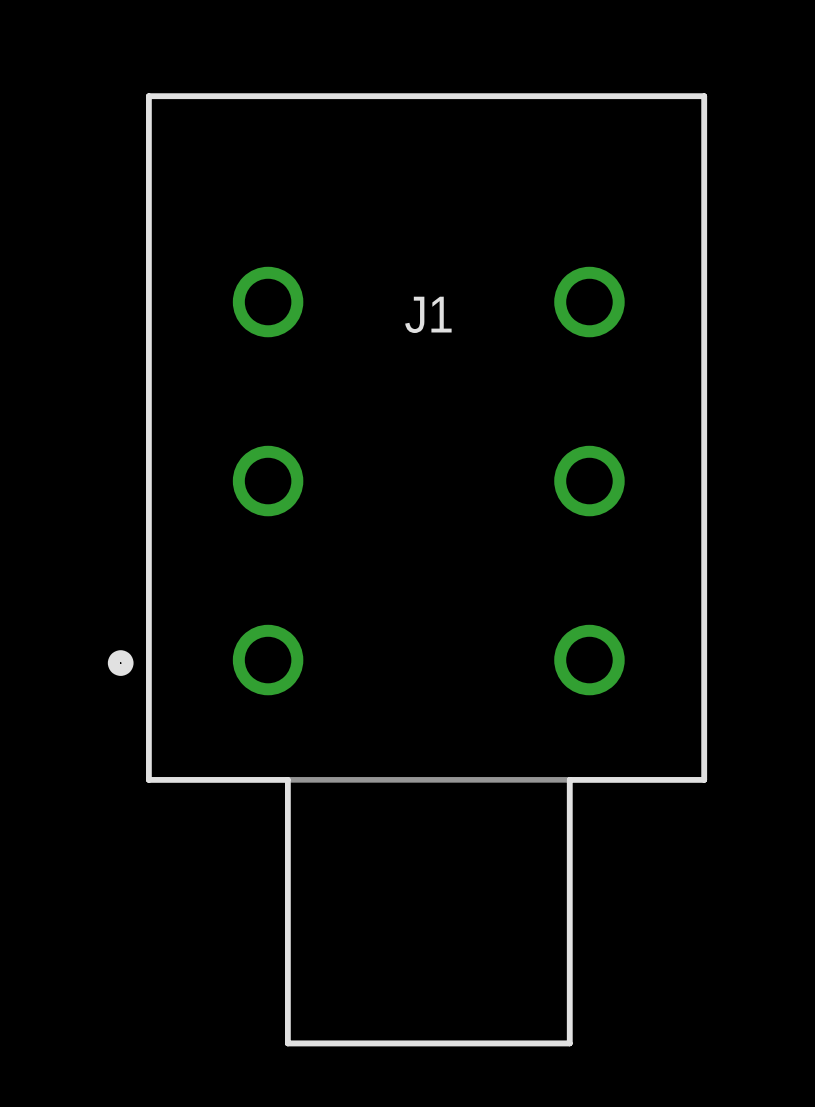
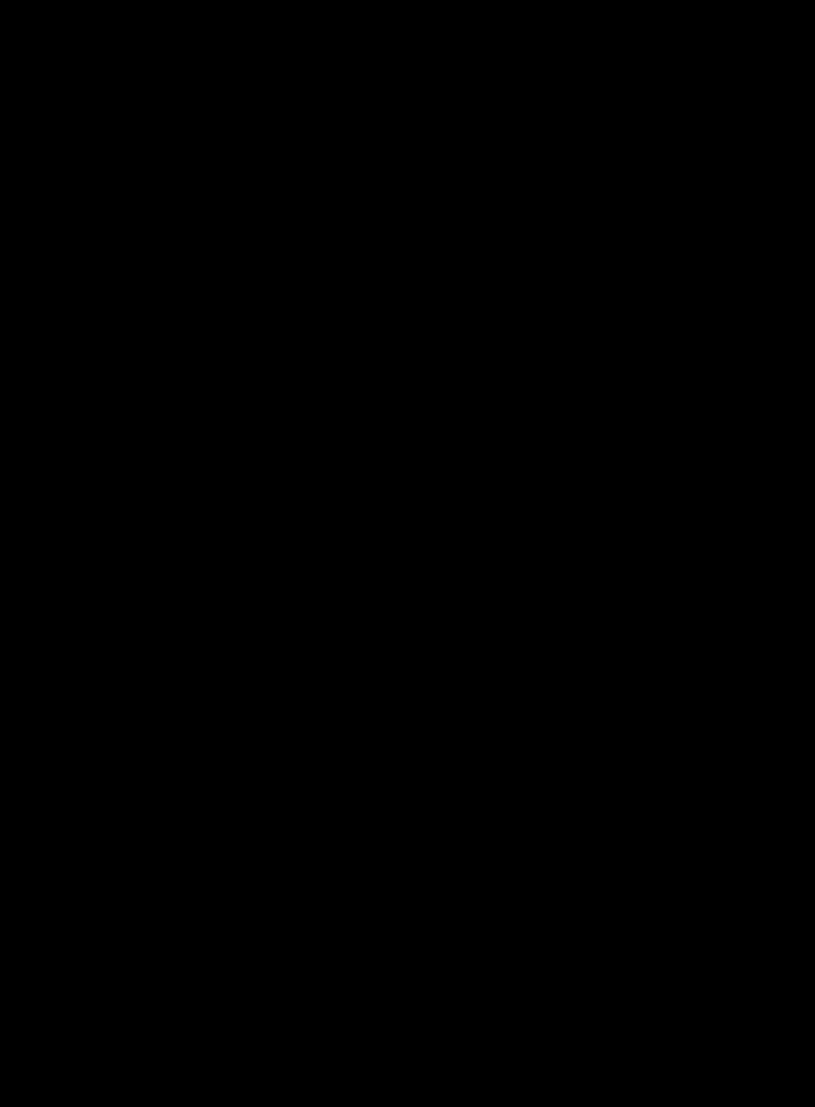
J1: (407, 569) -> none

